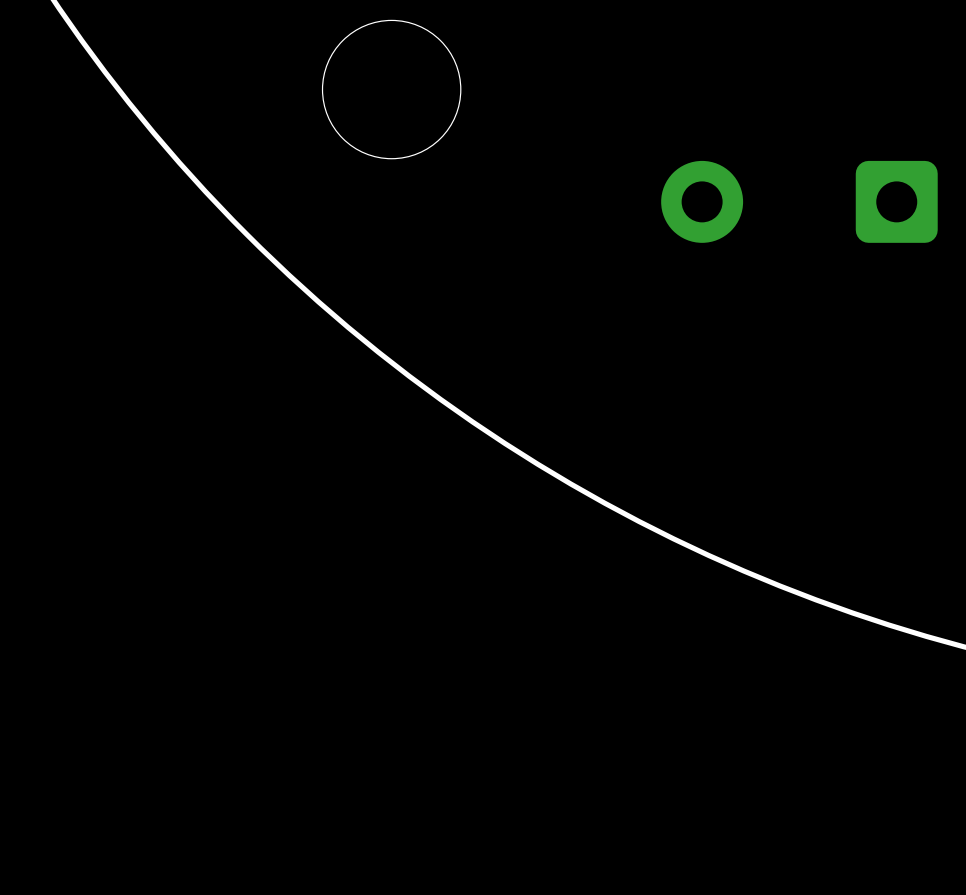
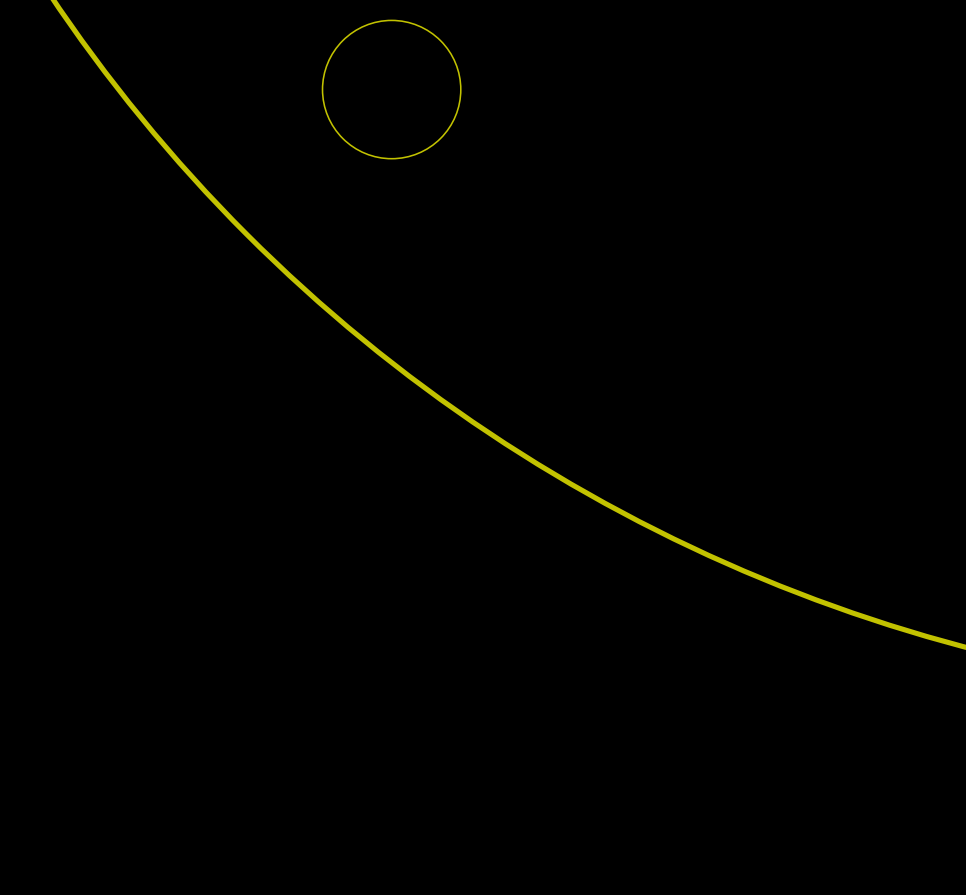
part: (799, 201) -> none

